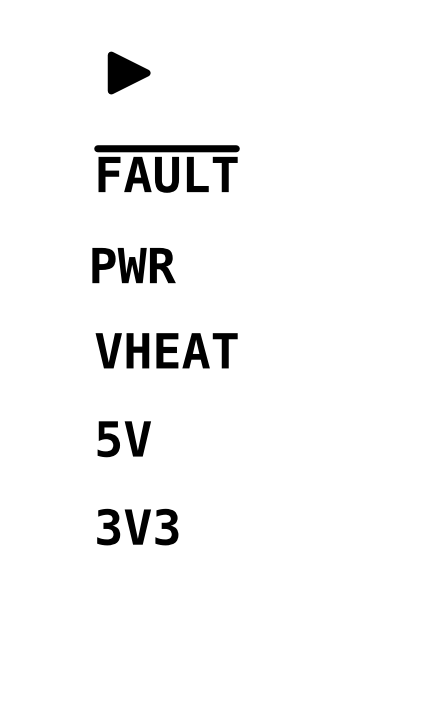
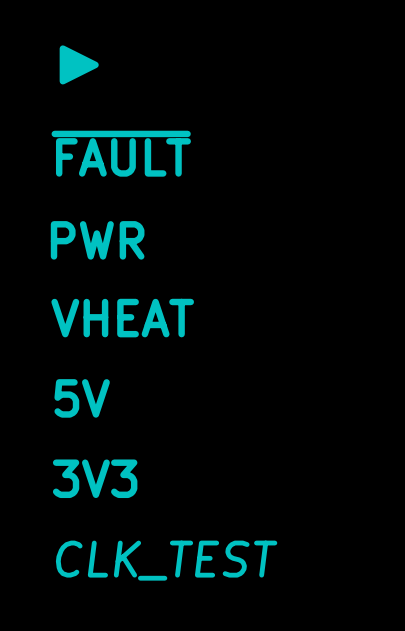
text: none -> CLK_TEST (166, 560)

